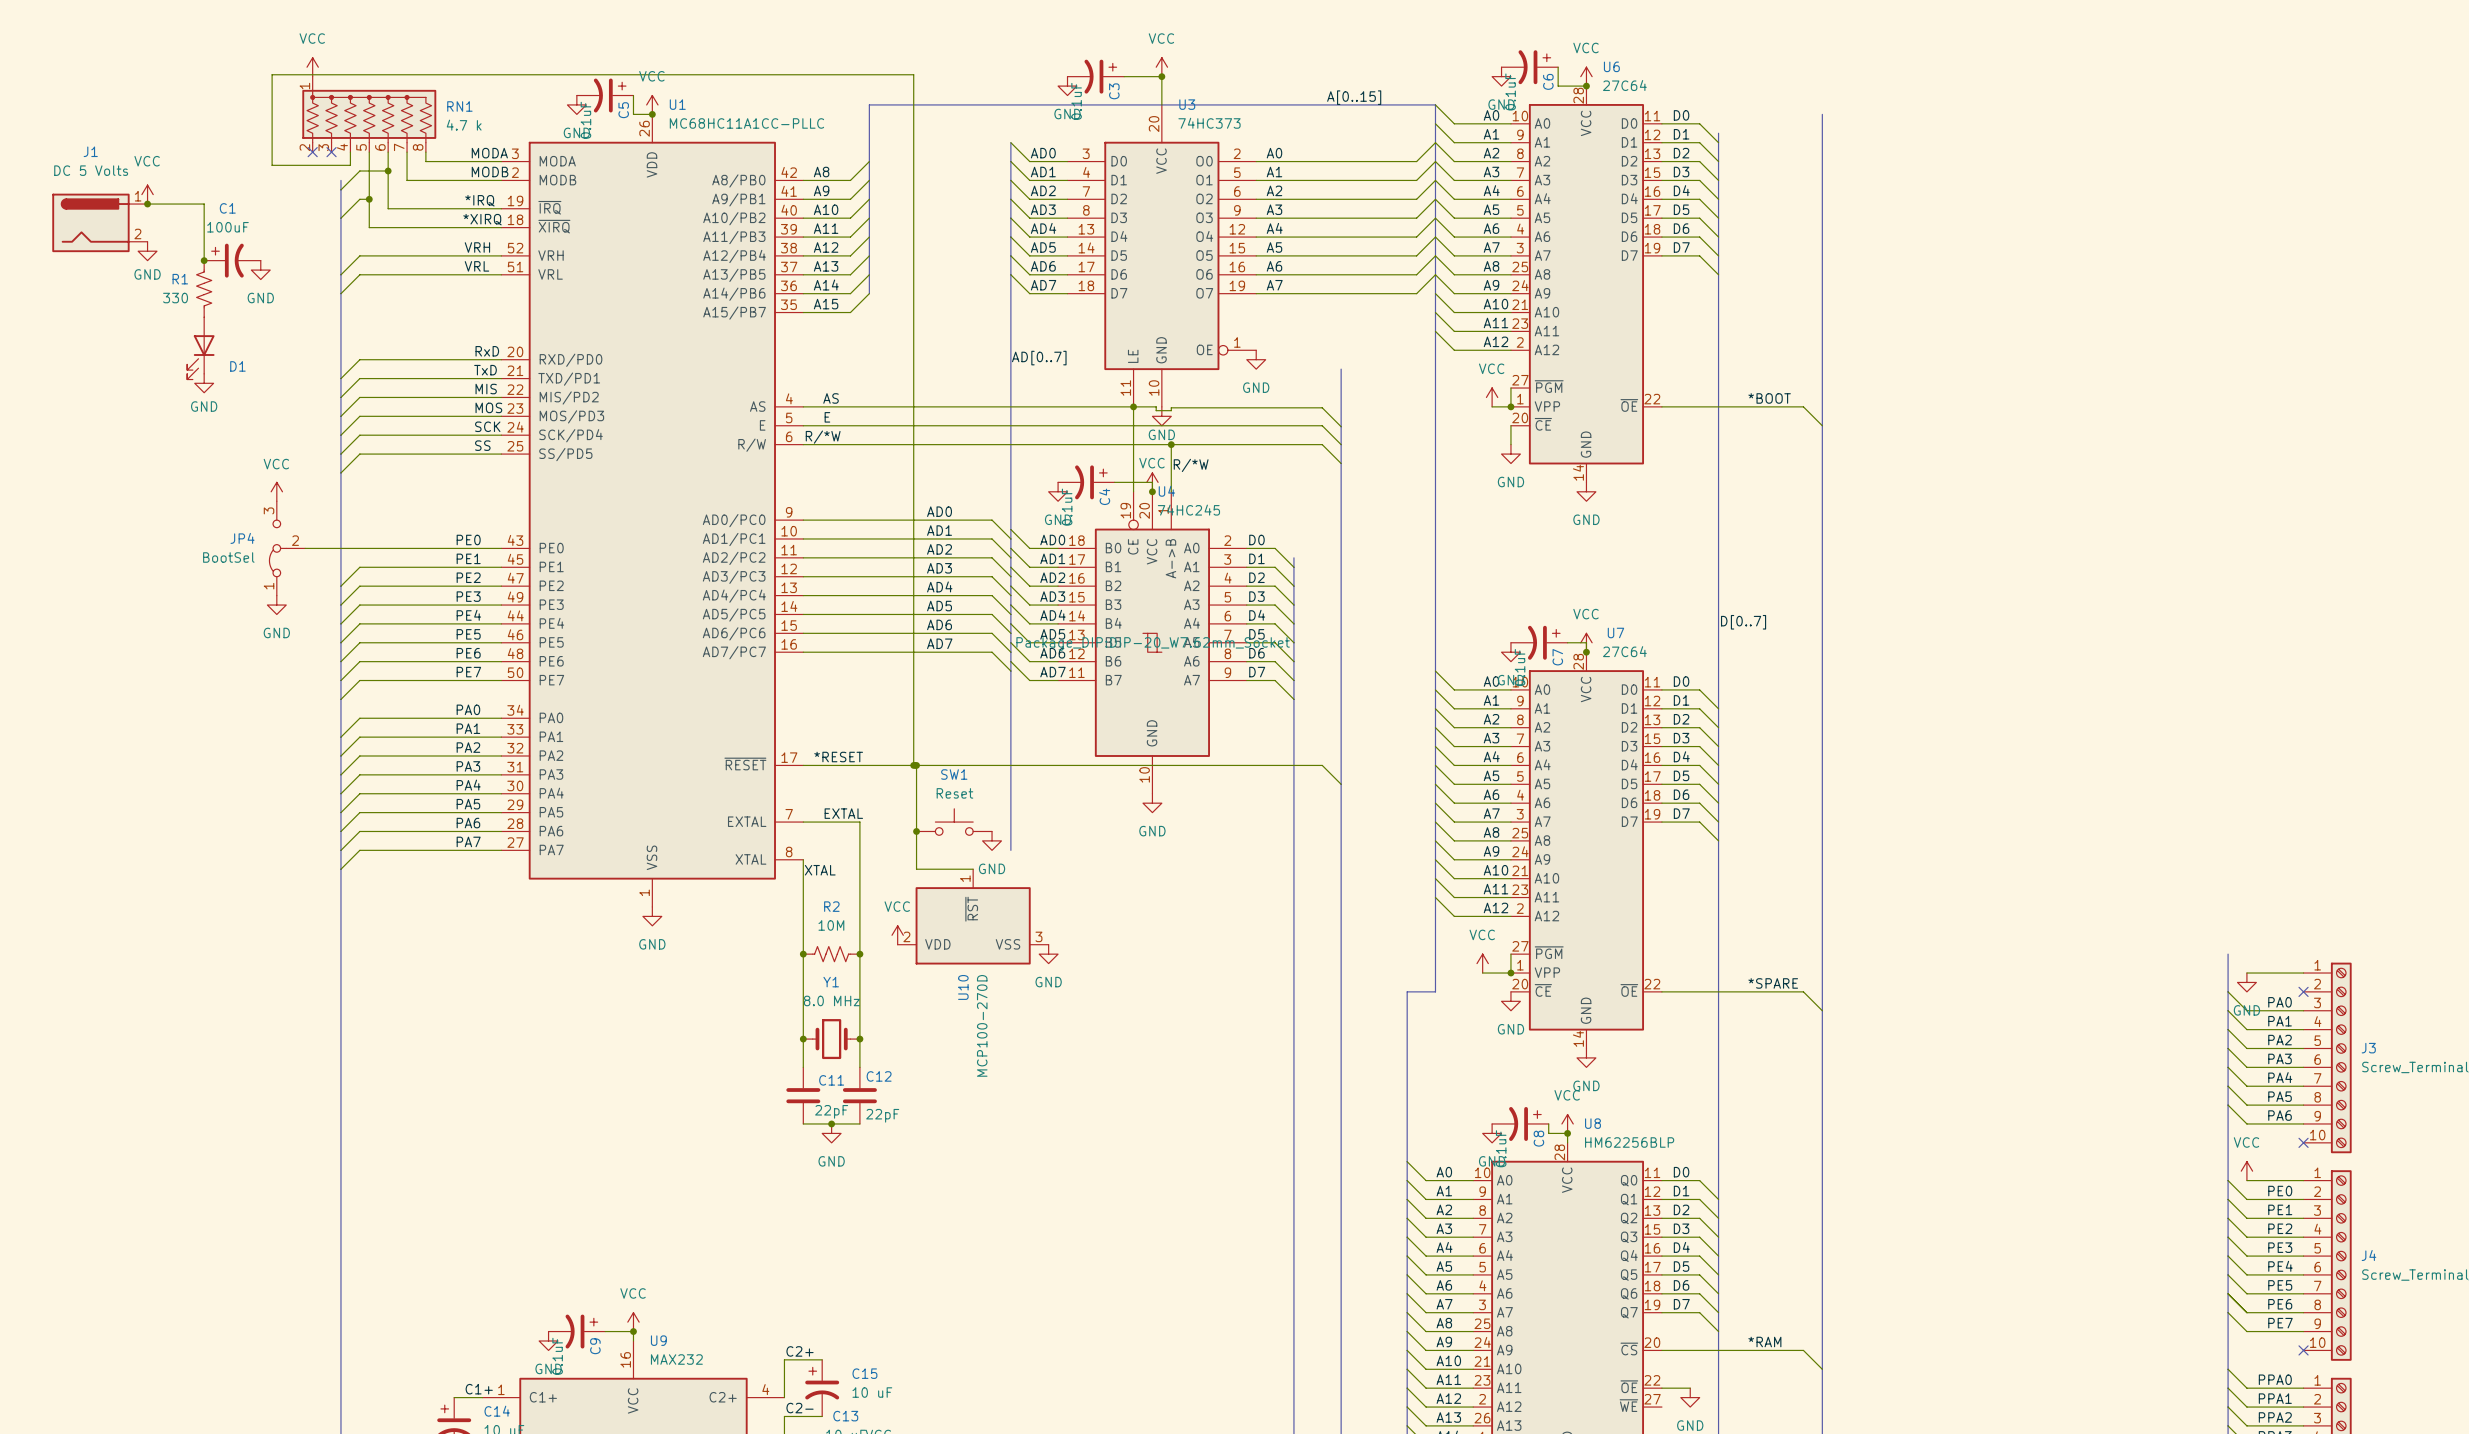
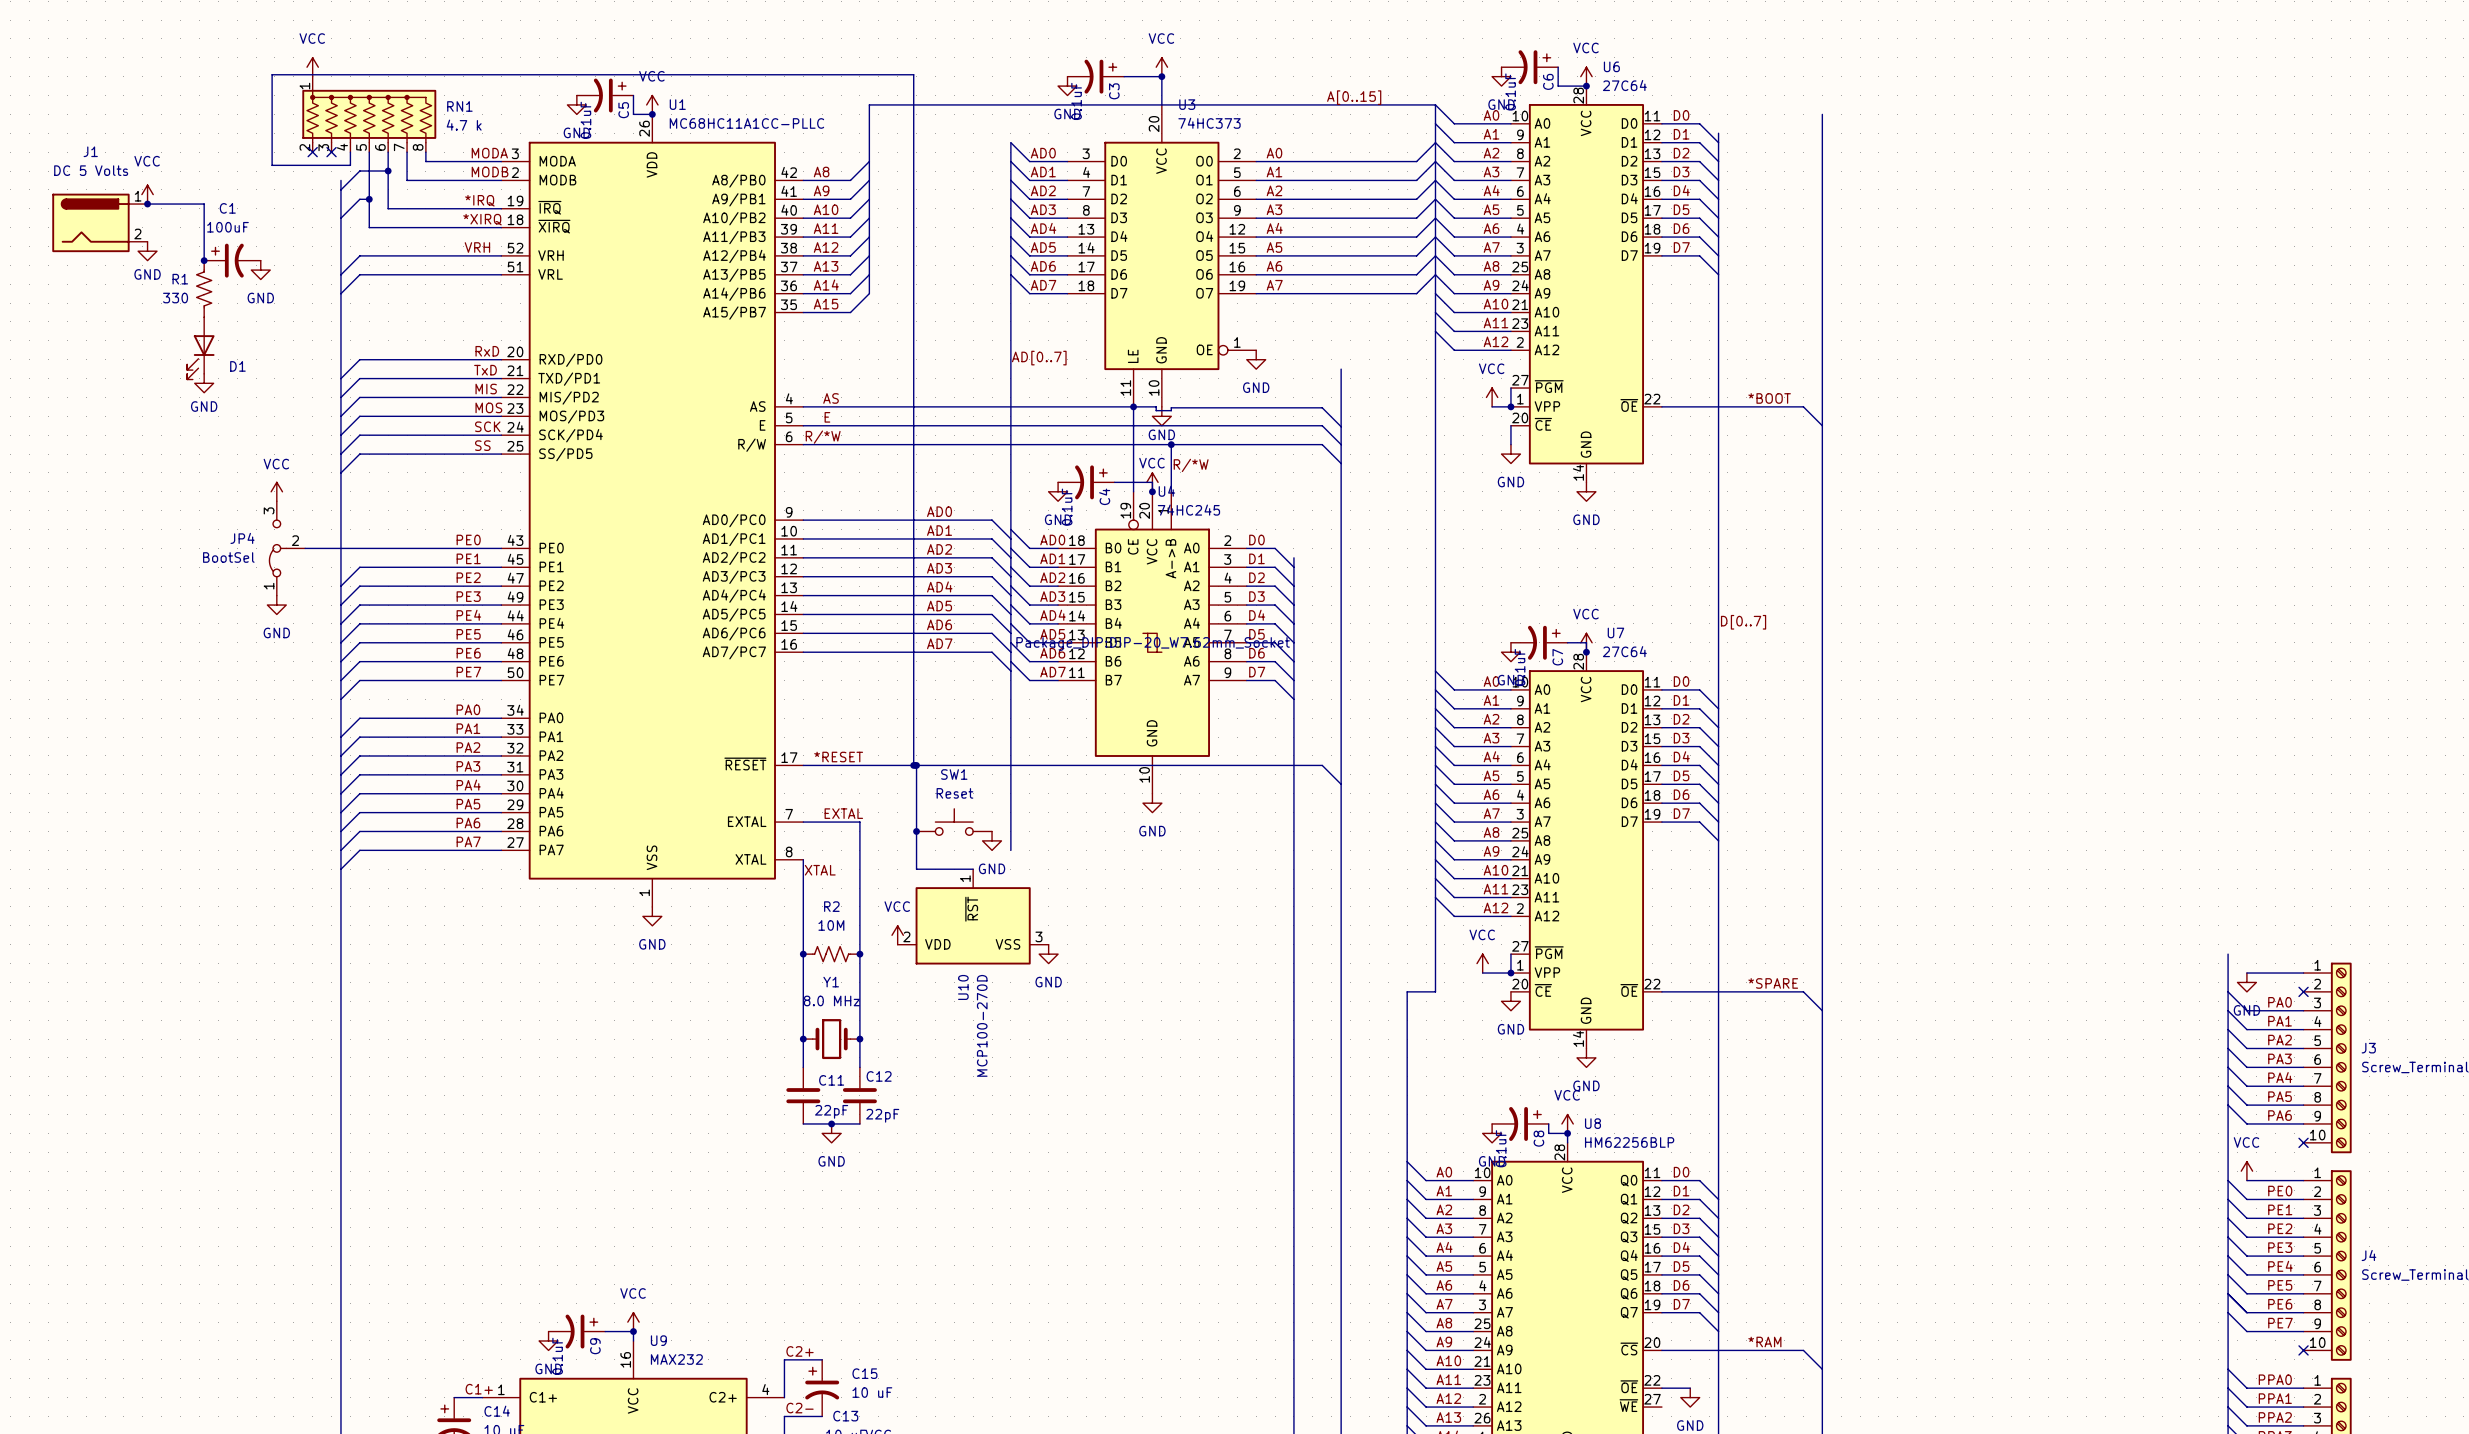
label: VRL (476, 266) -> none

